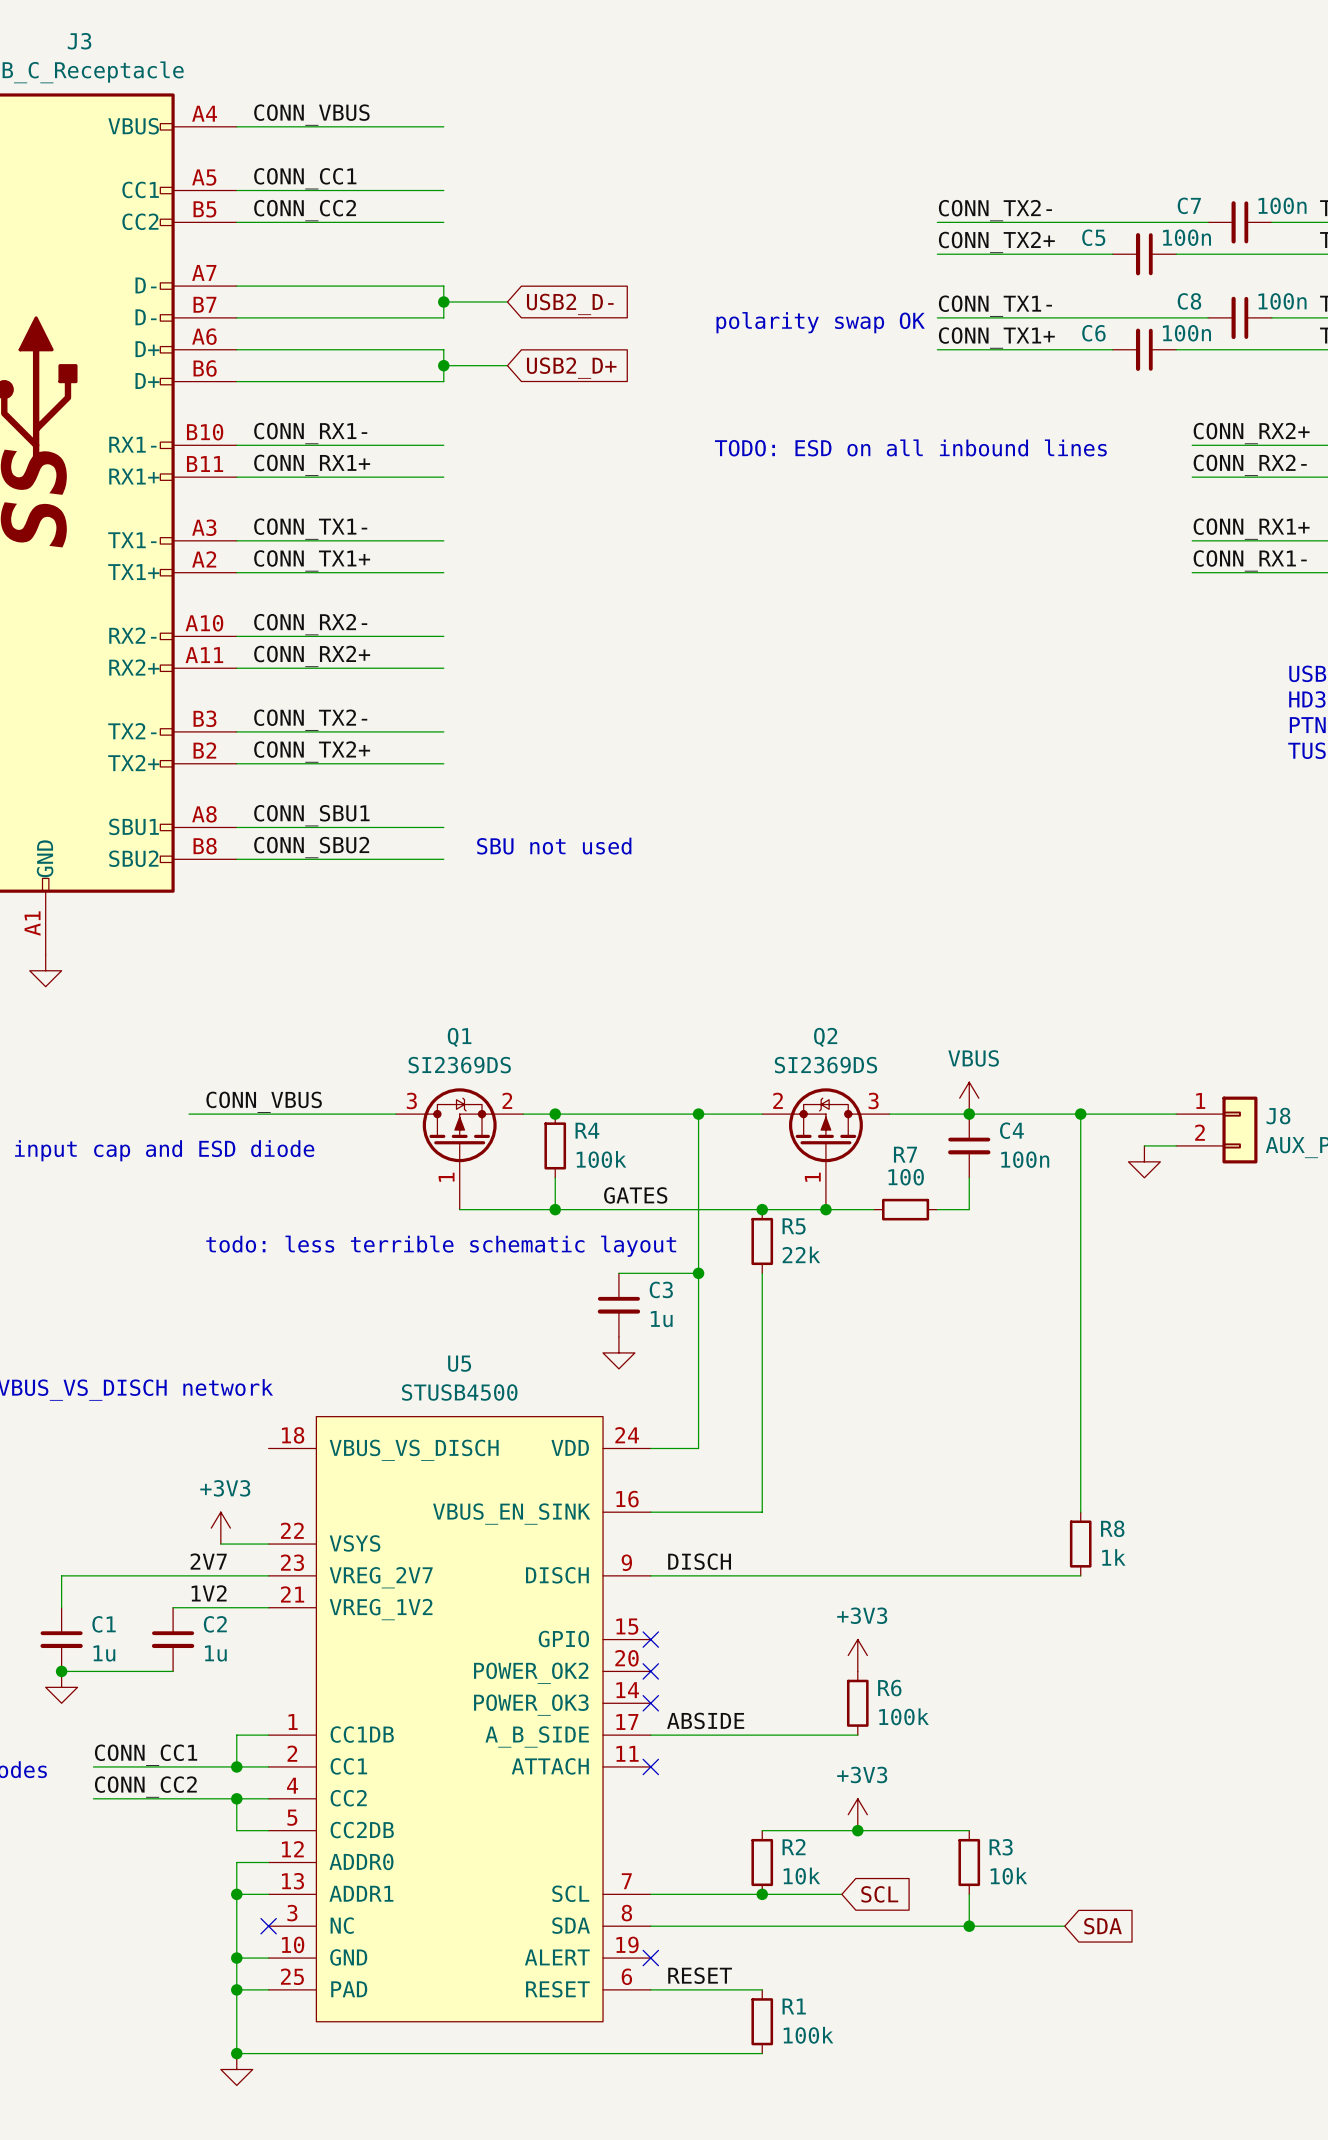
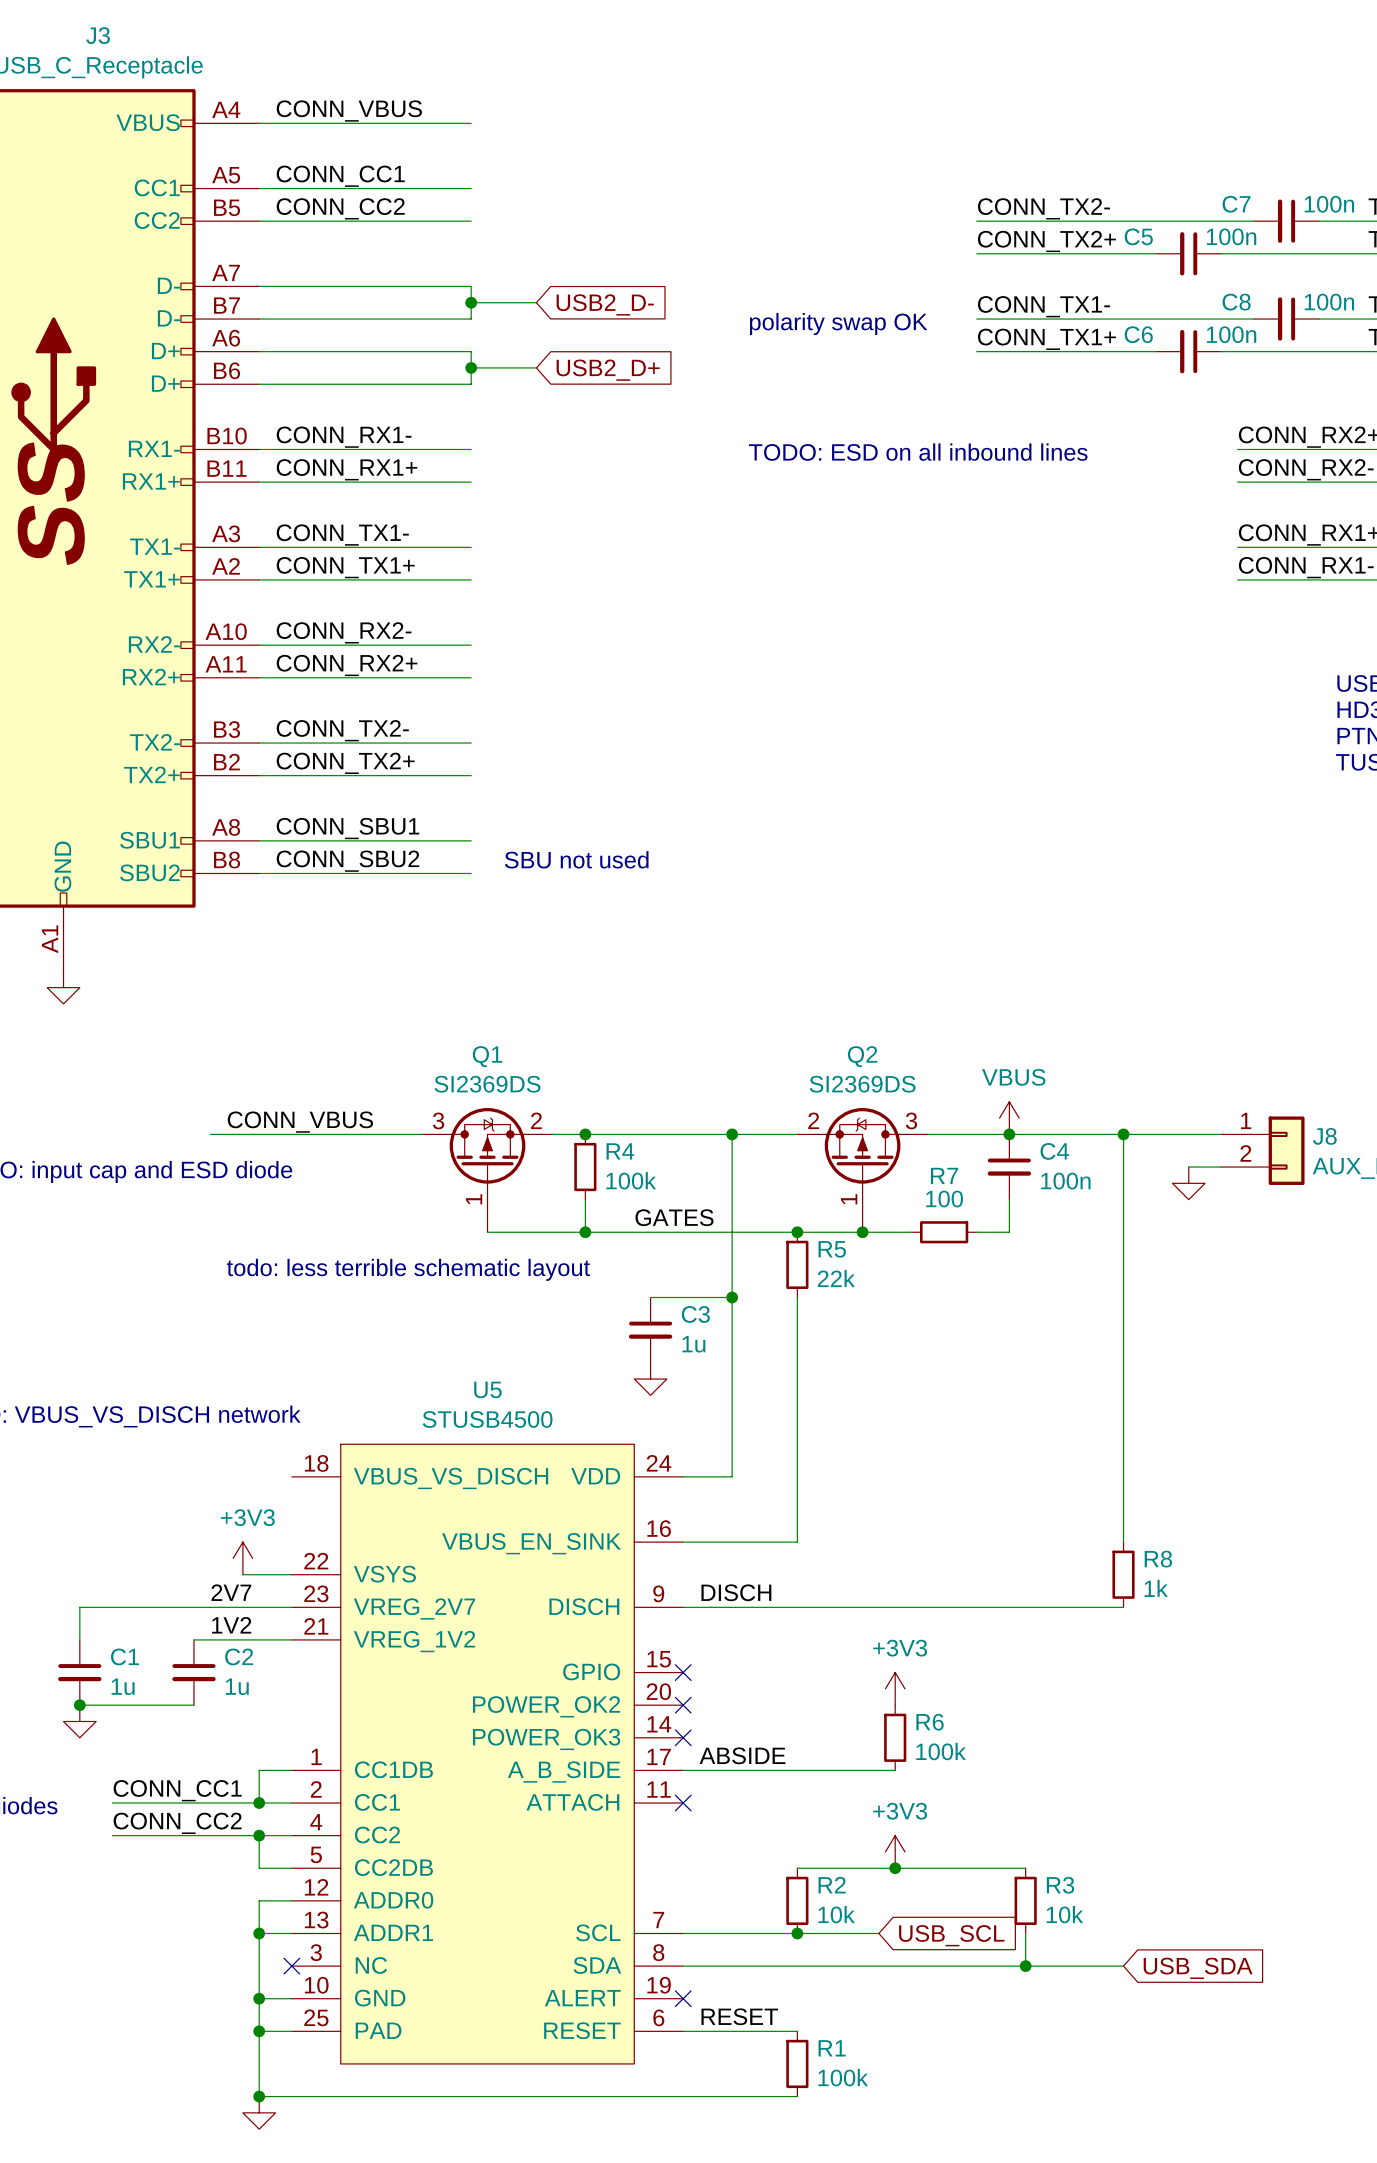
wire: none -> (1009, 1868) (1025, 1868)
R3 position: (969, 1862) -> (1025, 1900)
global label: SCL (879, 1894) -> USB_SCL (951, 1935)
wire: (969, 1894) (969, 1926) -> (1025, 1933) (1025, 1966)
junction position: (969, 1926) -> (1025, 1966)
wire: none -> (1107, 1966) (1123, 1966)
global label: SDA (1102, 1926) -> none
global label: none -> USB_SDA (1198, 1968)

